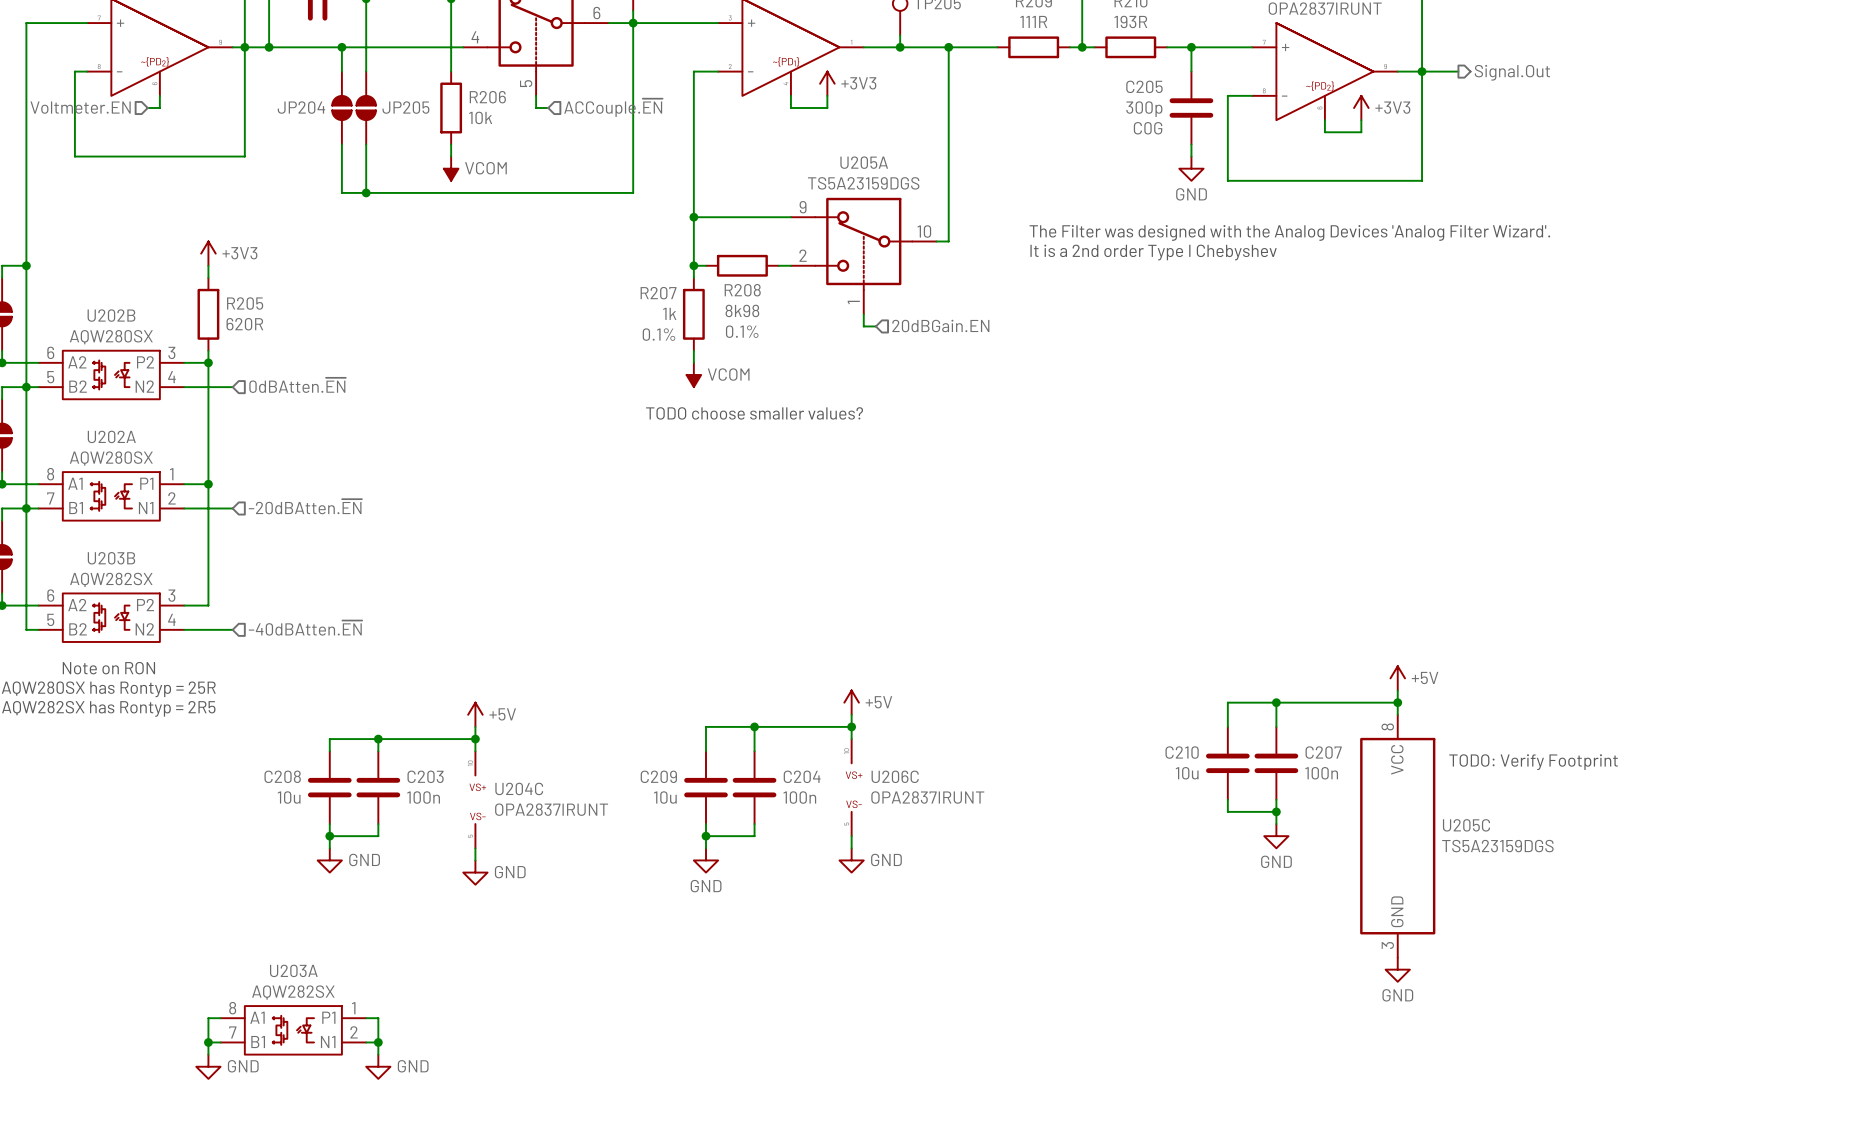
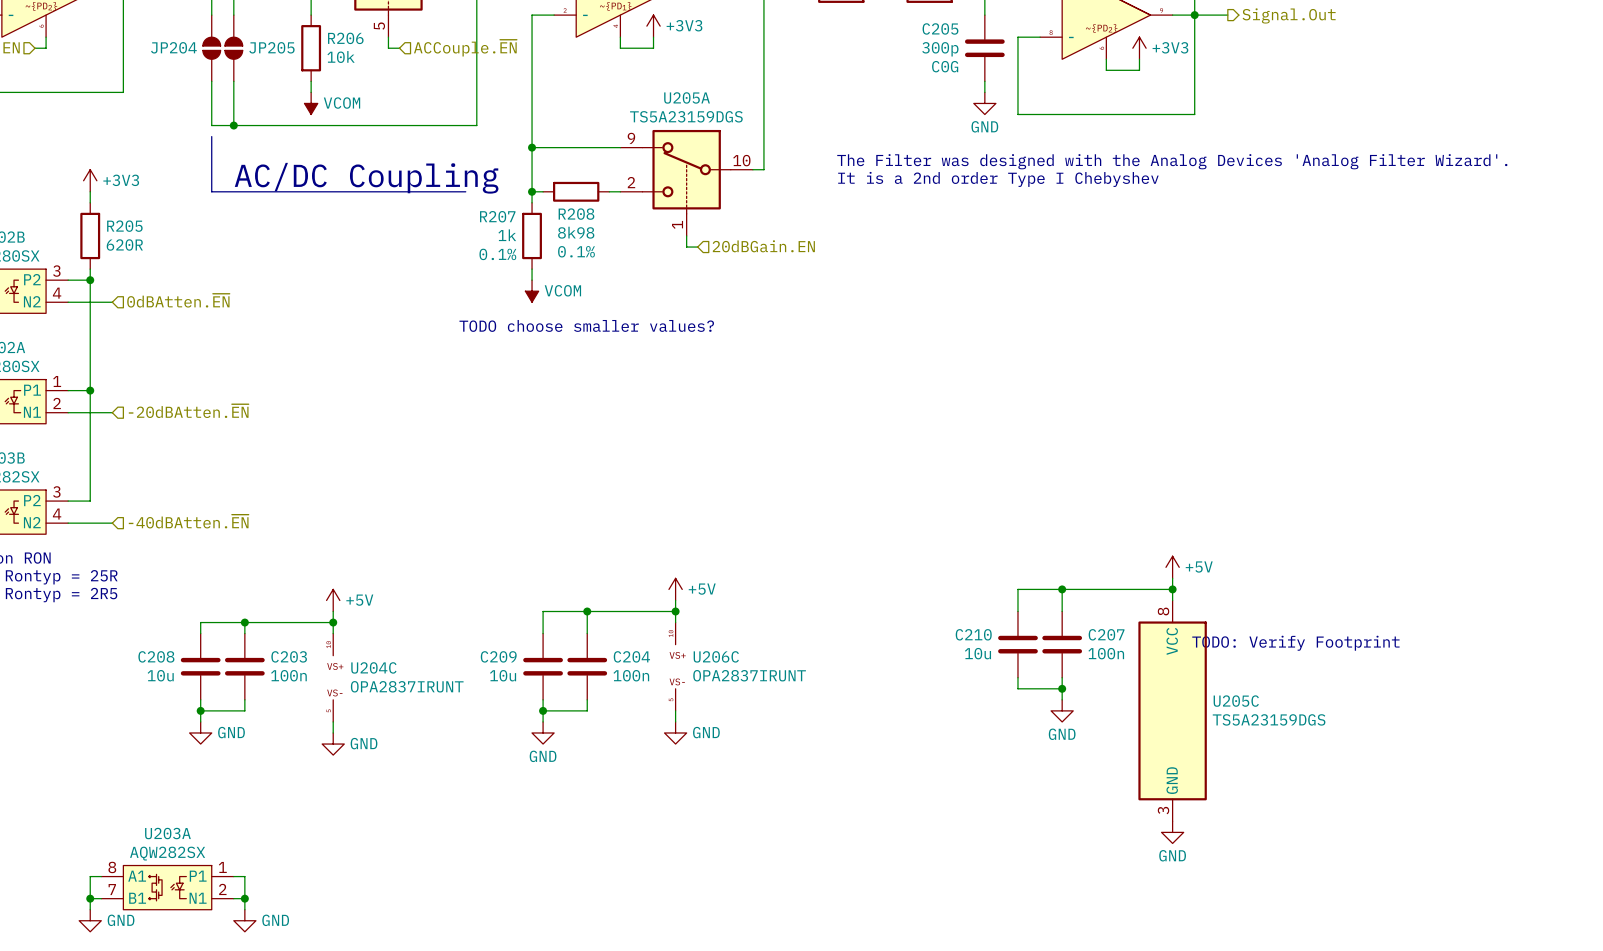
line: none -> (211, 136) (211, 191) (465, 191)
text: none -> AC/DC Coupling (366, 178)

